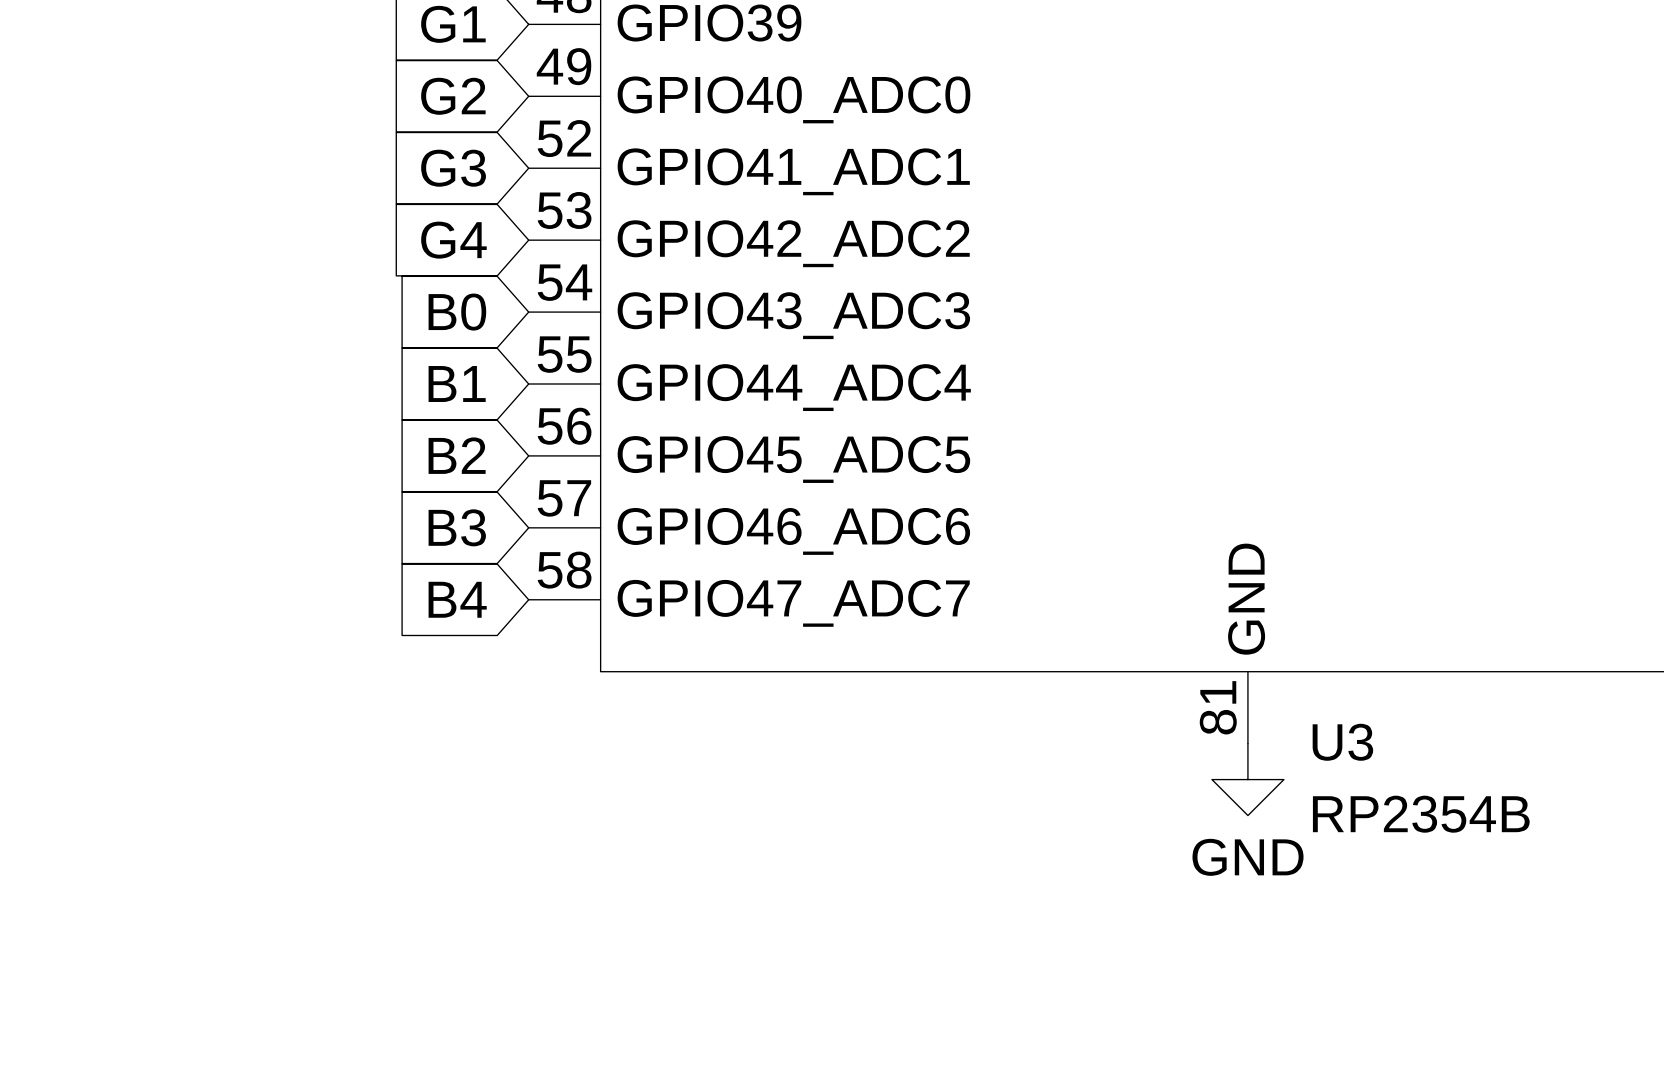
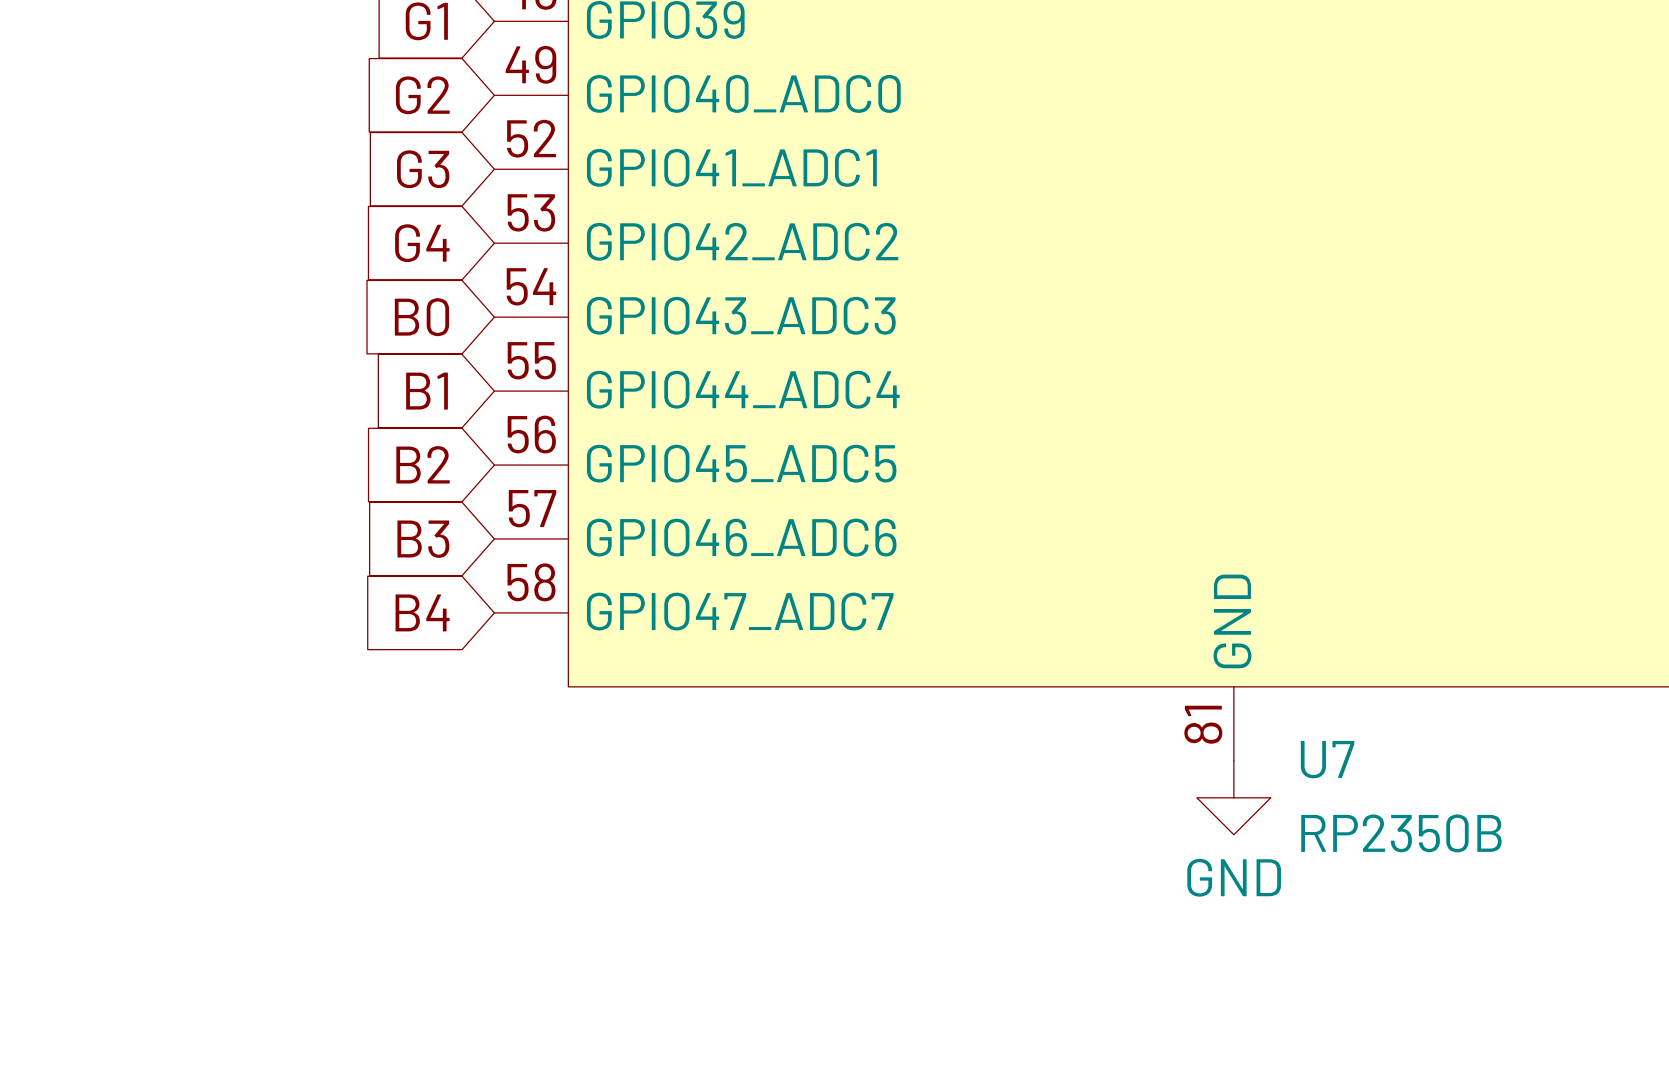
U3 name: U3 (1342, 742) -> U7 (1327, 759)
U3 value: RP2354B (1421, 814) -> RP2350B (1401, 833)

